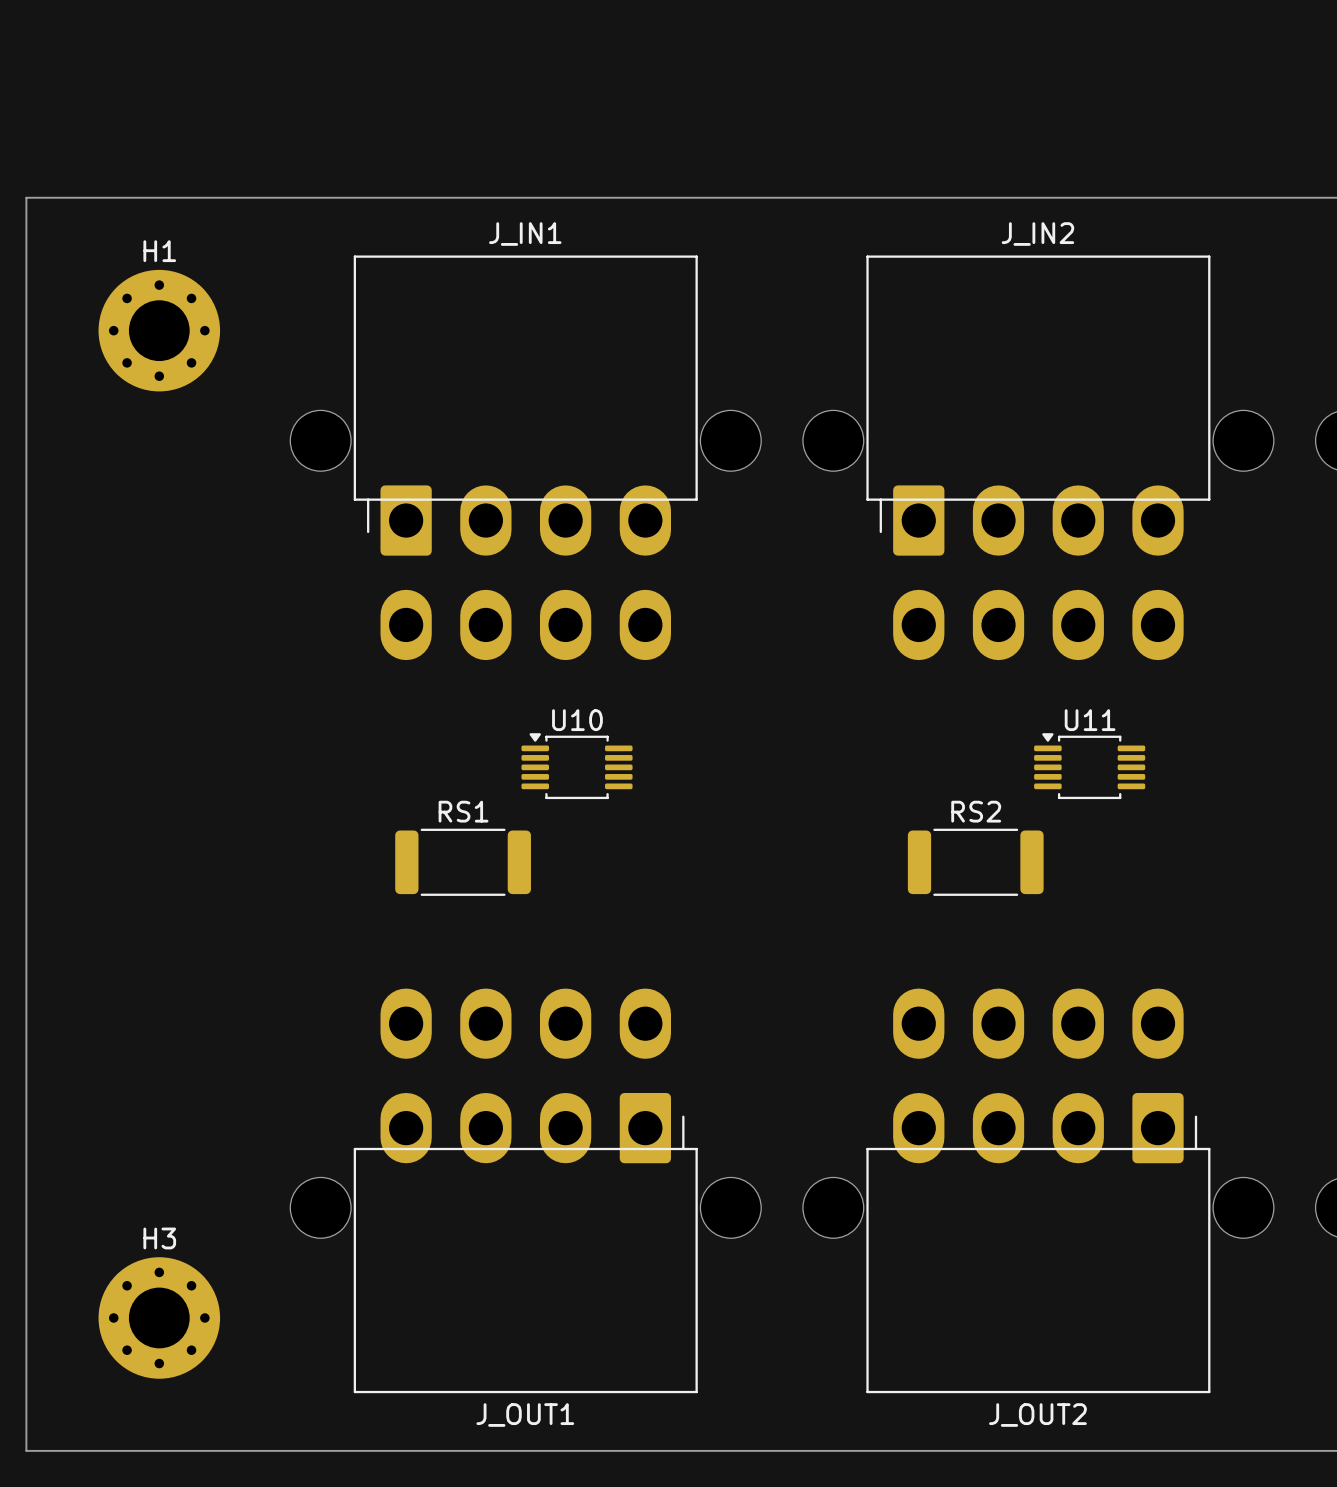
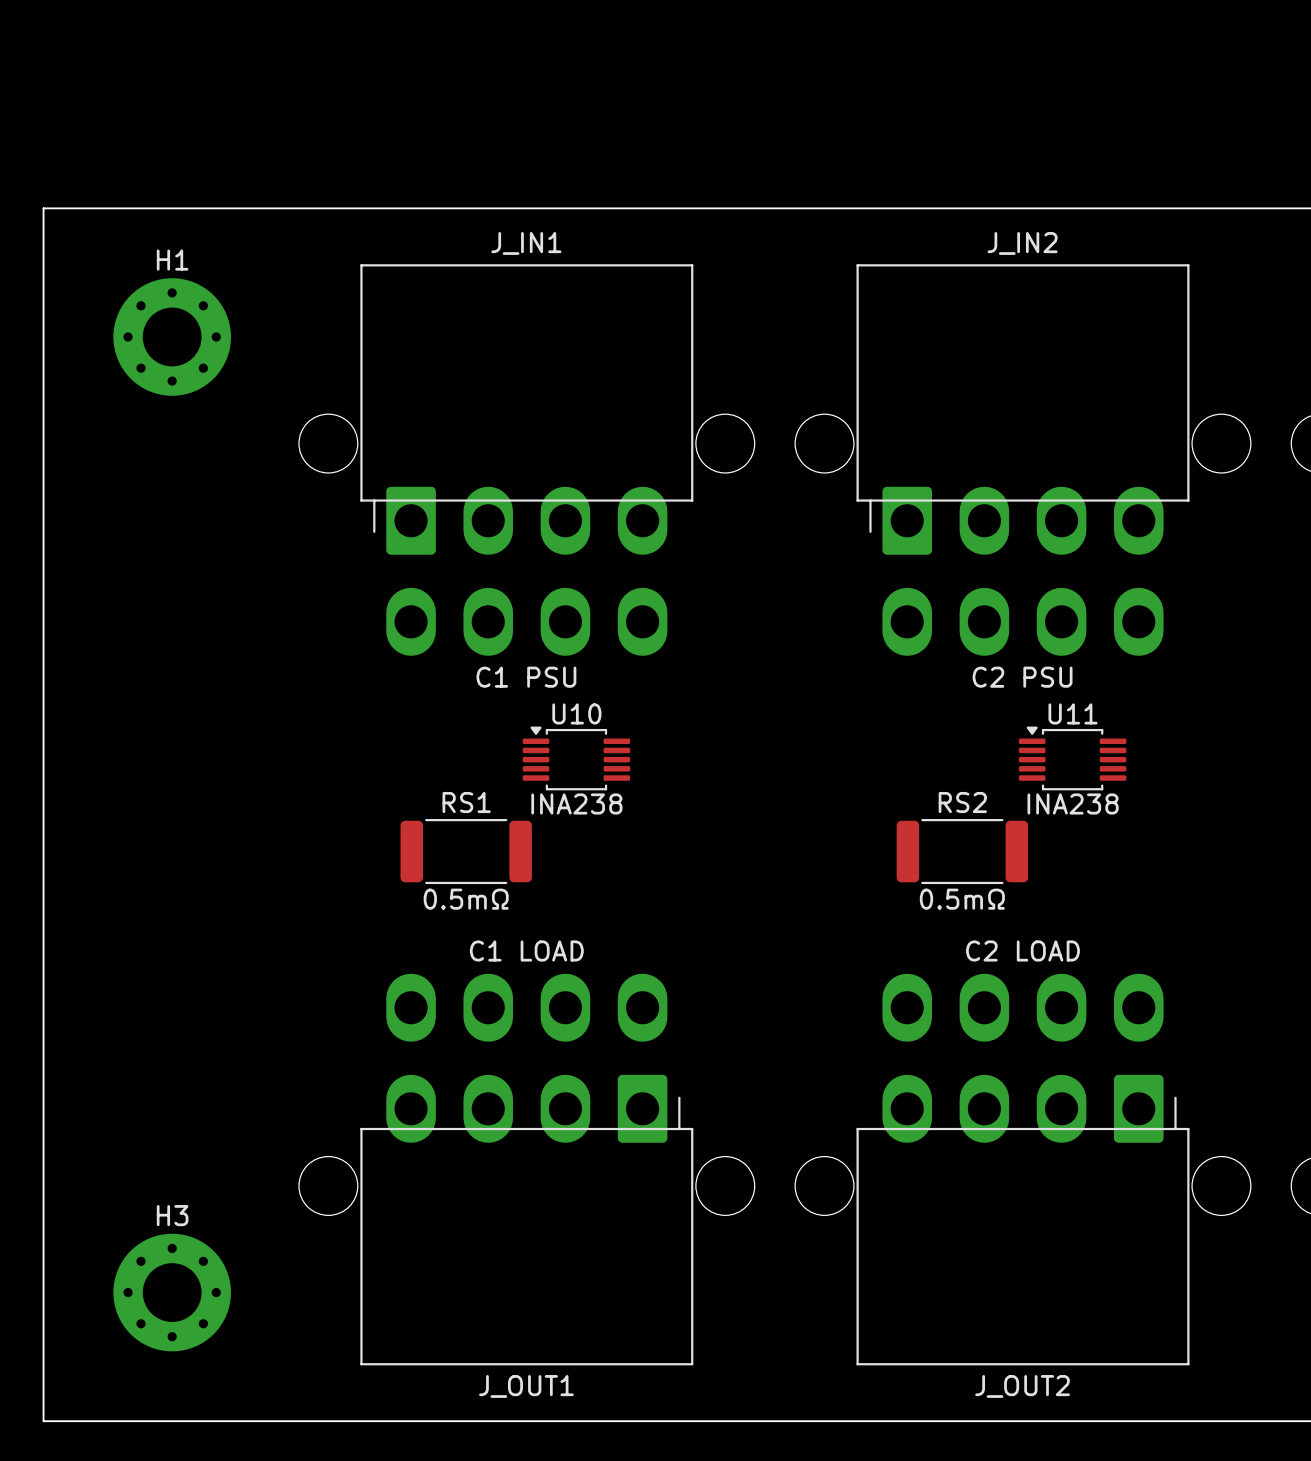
J_IN1 value: none -> C1 PSU (526, 677)
J_IN2 value: none -> C2 PSU (1022, 677)
U10 value: none -> INA238 (576, 803)
U11 value: none -> INA238 (1073, 803)
RS1 value: none -> 0.5mΩ (466, 899)
RS2 value: none -> 0.5mΩ (962, 899)
J_OUT1 value: none -> C1 LOAD (526, 950)
J_OUT2 value: none -> C2 LOAD (1022, 950)

